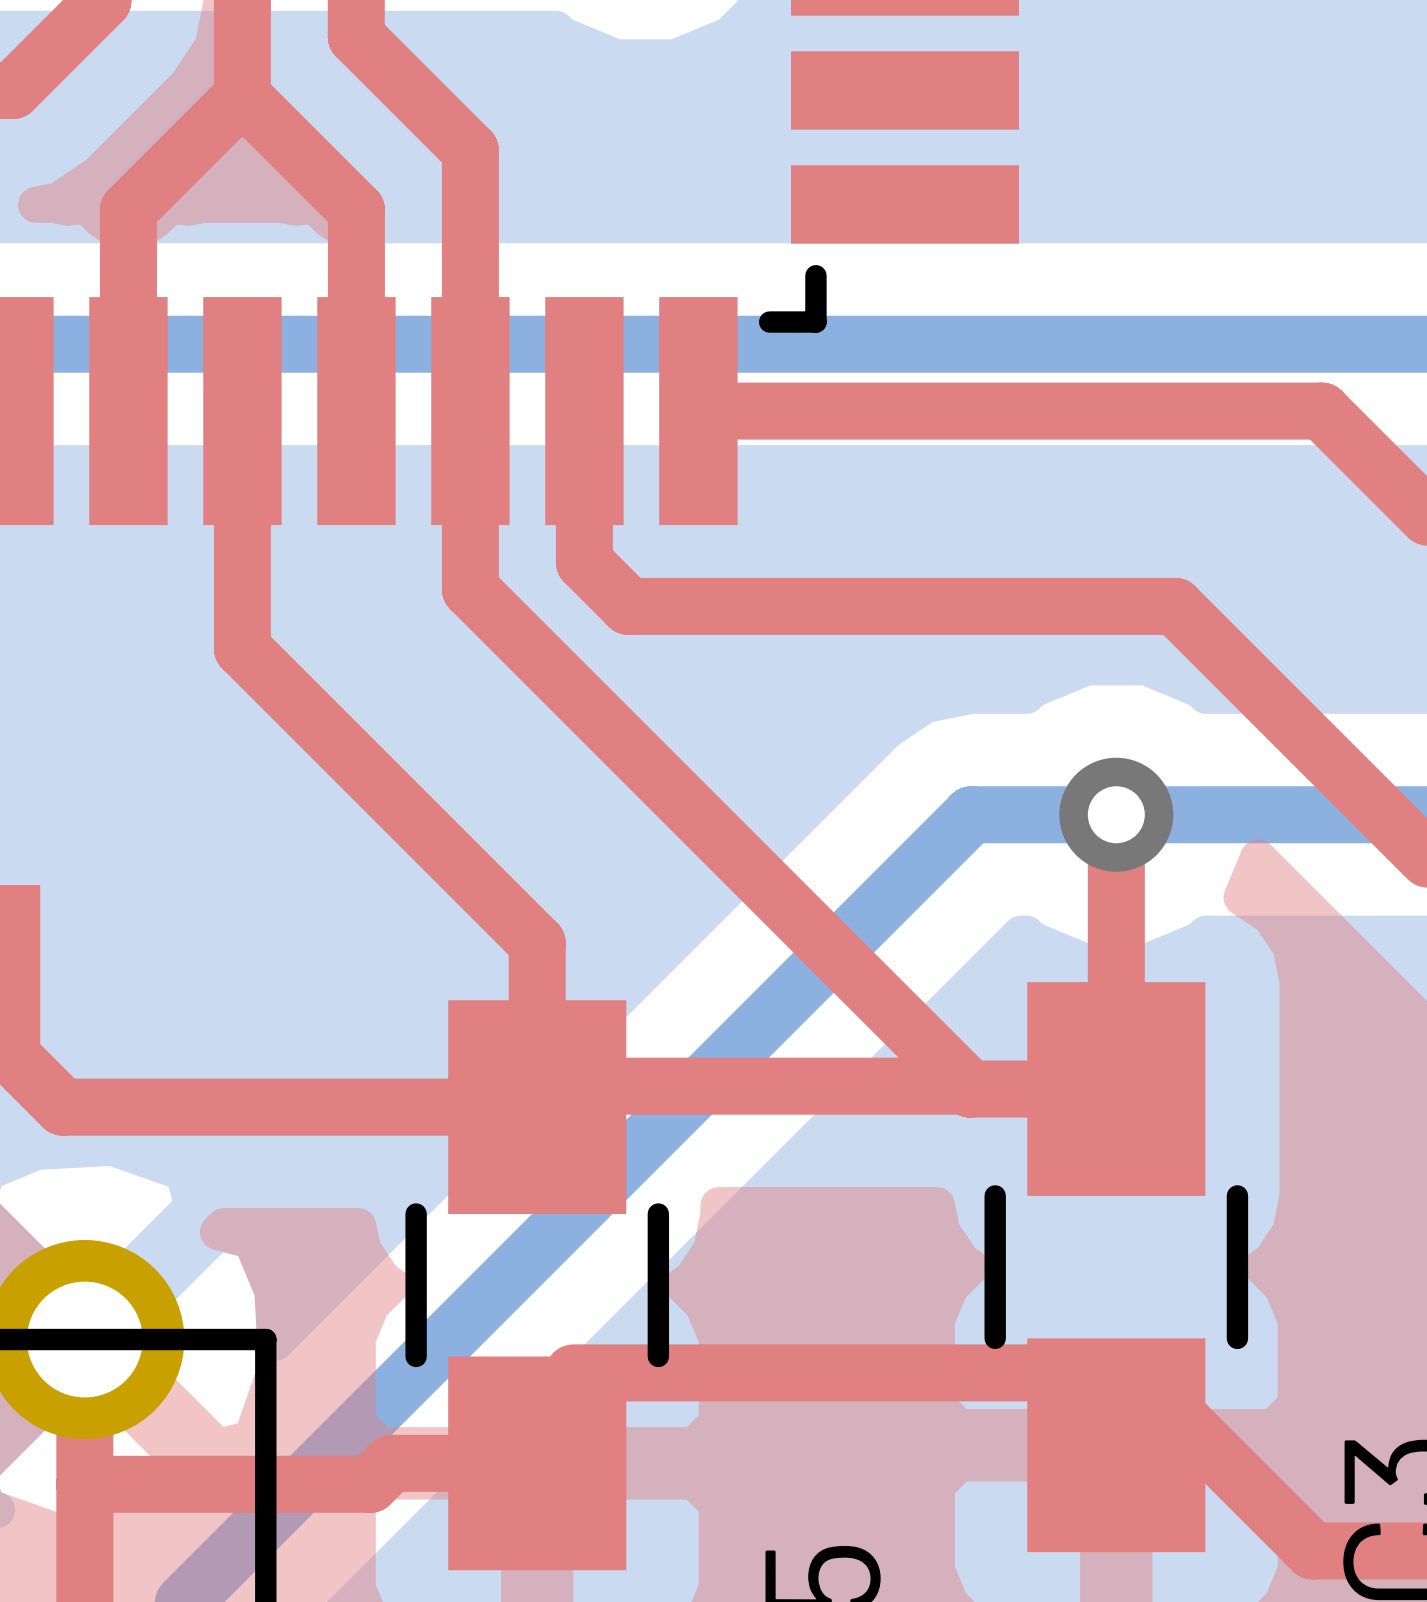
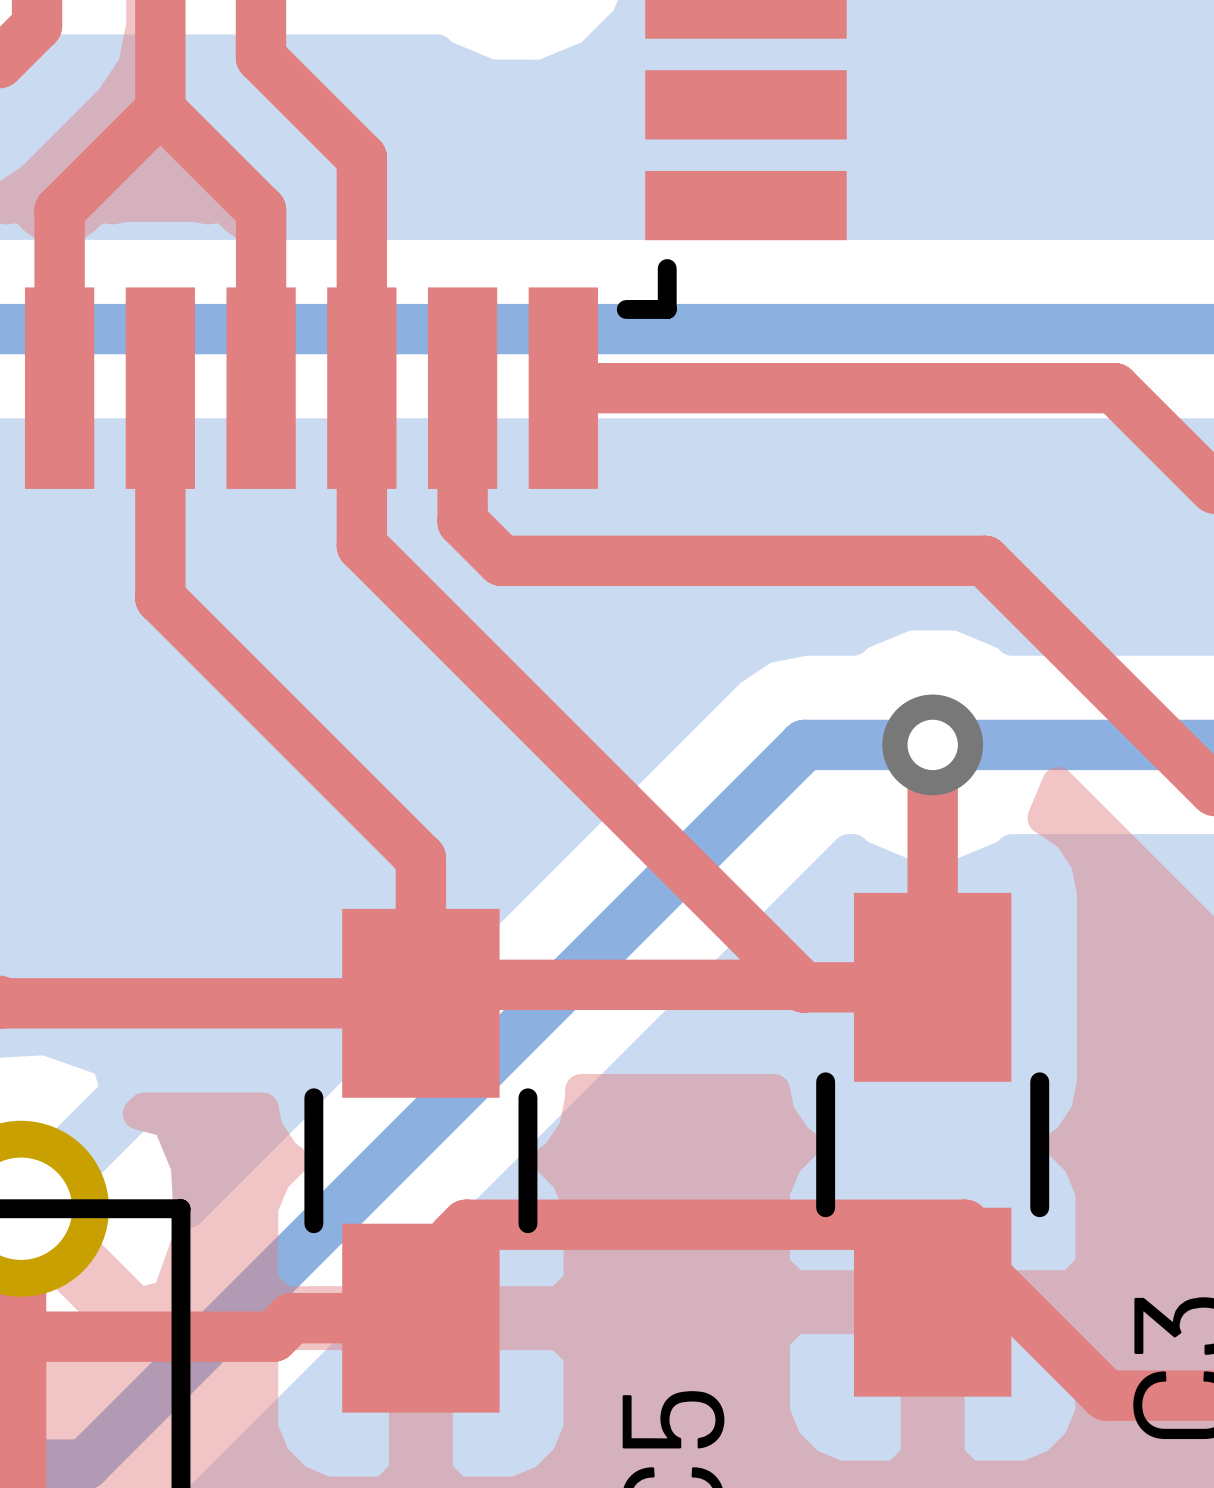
top track: (573, 1372) (1152, 1372) -> (452, 1238) (466, 1224) (964, 1224) (964, 1238)

